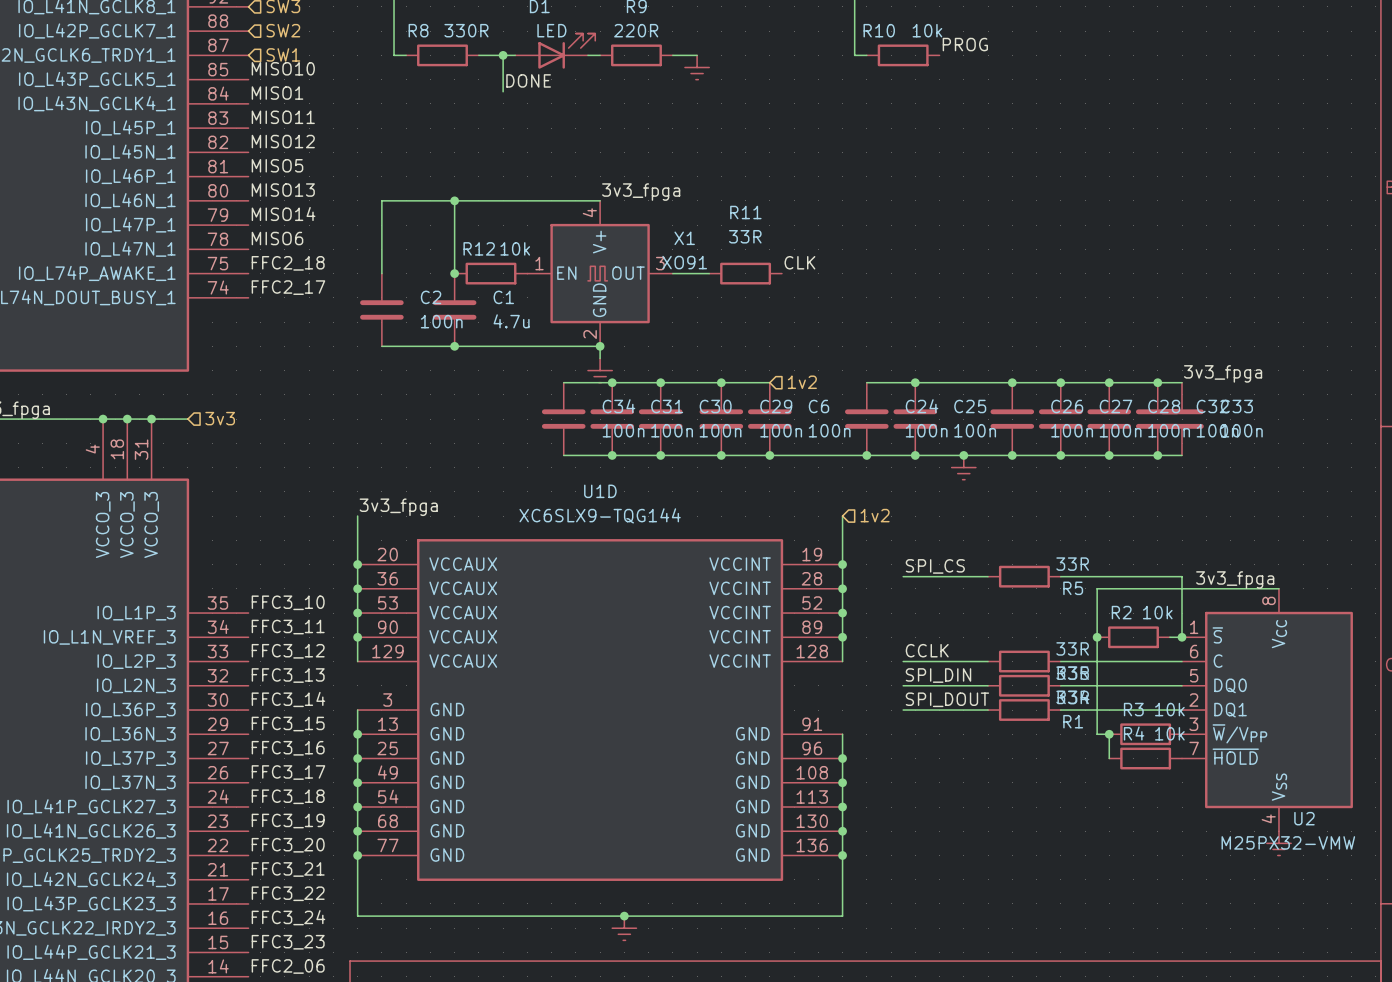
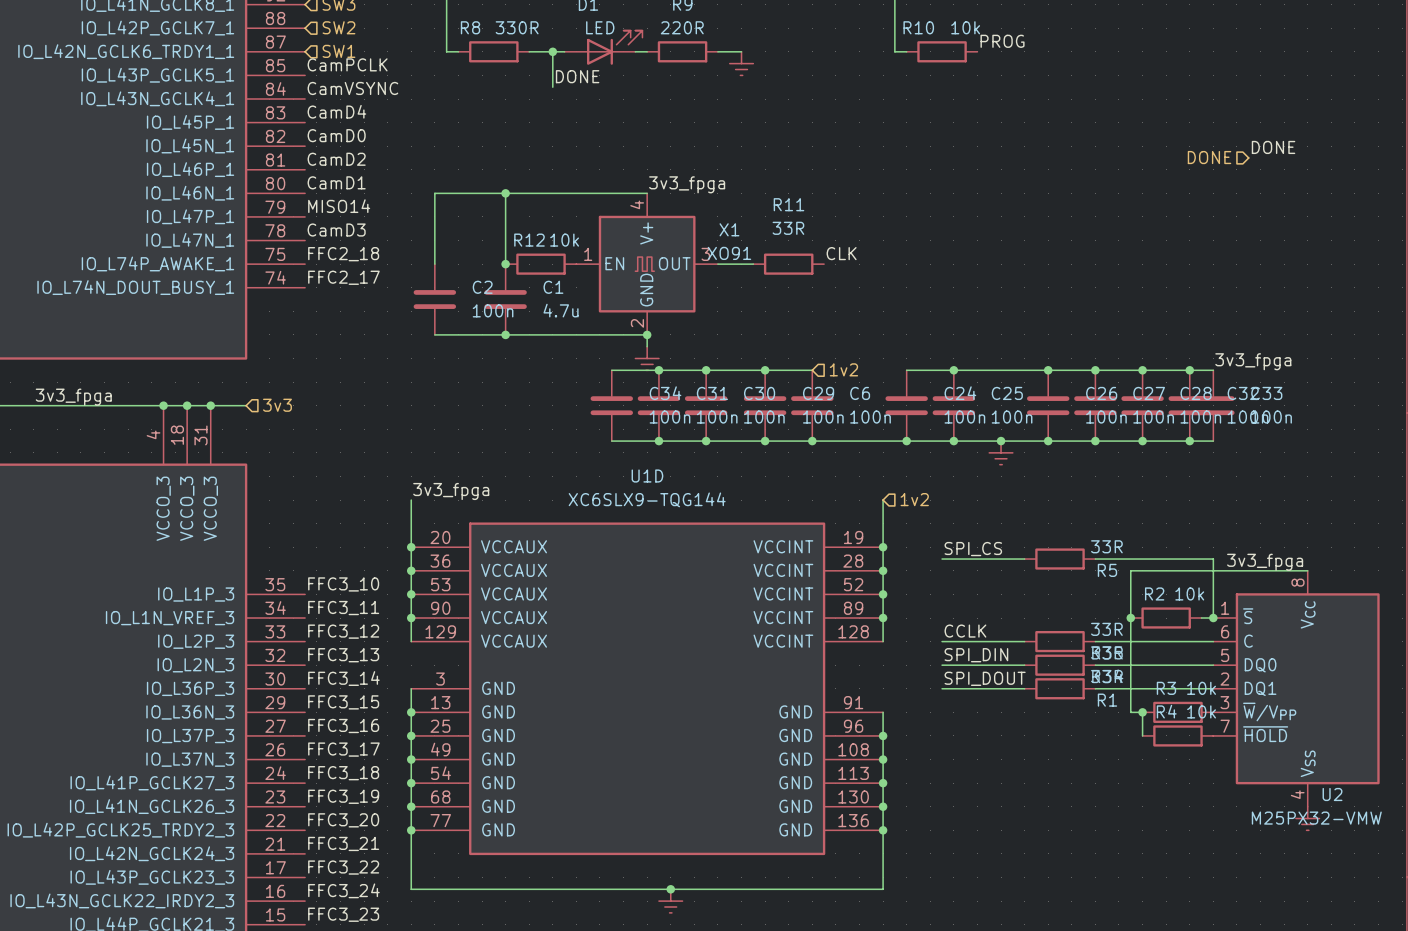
label: MISO10 (283, 68) -> CamPCLK (347, 64)
label: MISO1 (277, 93) -> CamVSYNC (352, 88)
label: MISO11 (283, 117) -> CamD4 (336, 111)
label: MISO12 (283, 141) -> CamD0 (336, 135)
label: none -> DONE (1273, 147)
hierarchical label: none -> DONE (1209, 157)
label: MISO5 (277, 165) -> CamD2 (336, 159)
label: MISO13 (283, 190) -> CamD1 (336, 182)
label: MISO6 (277, 238) -> CamD3 (336, 230)

